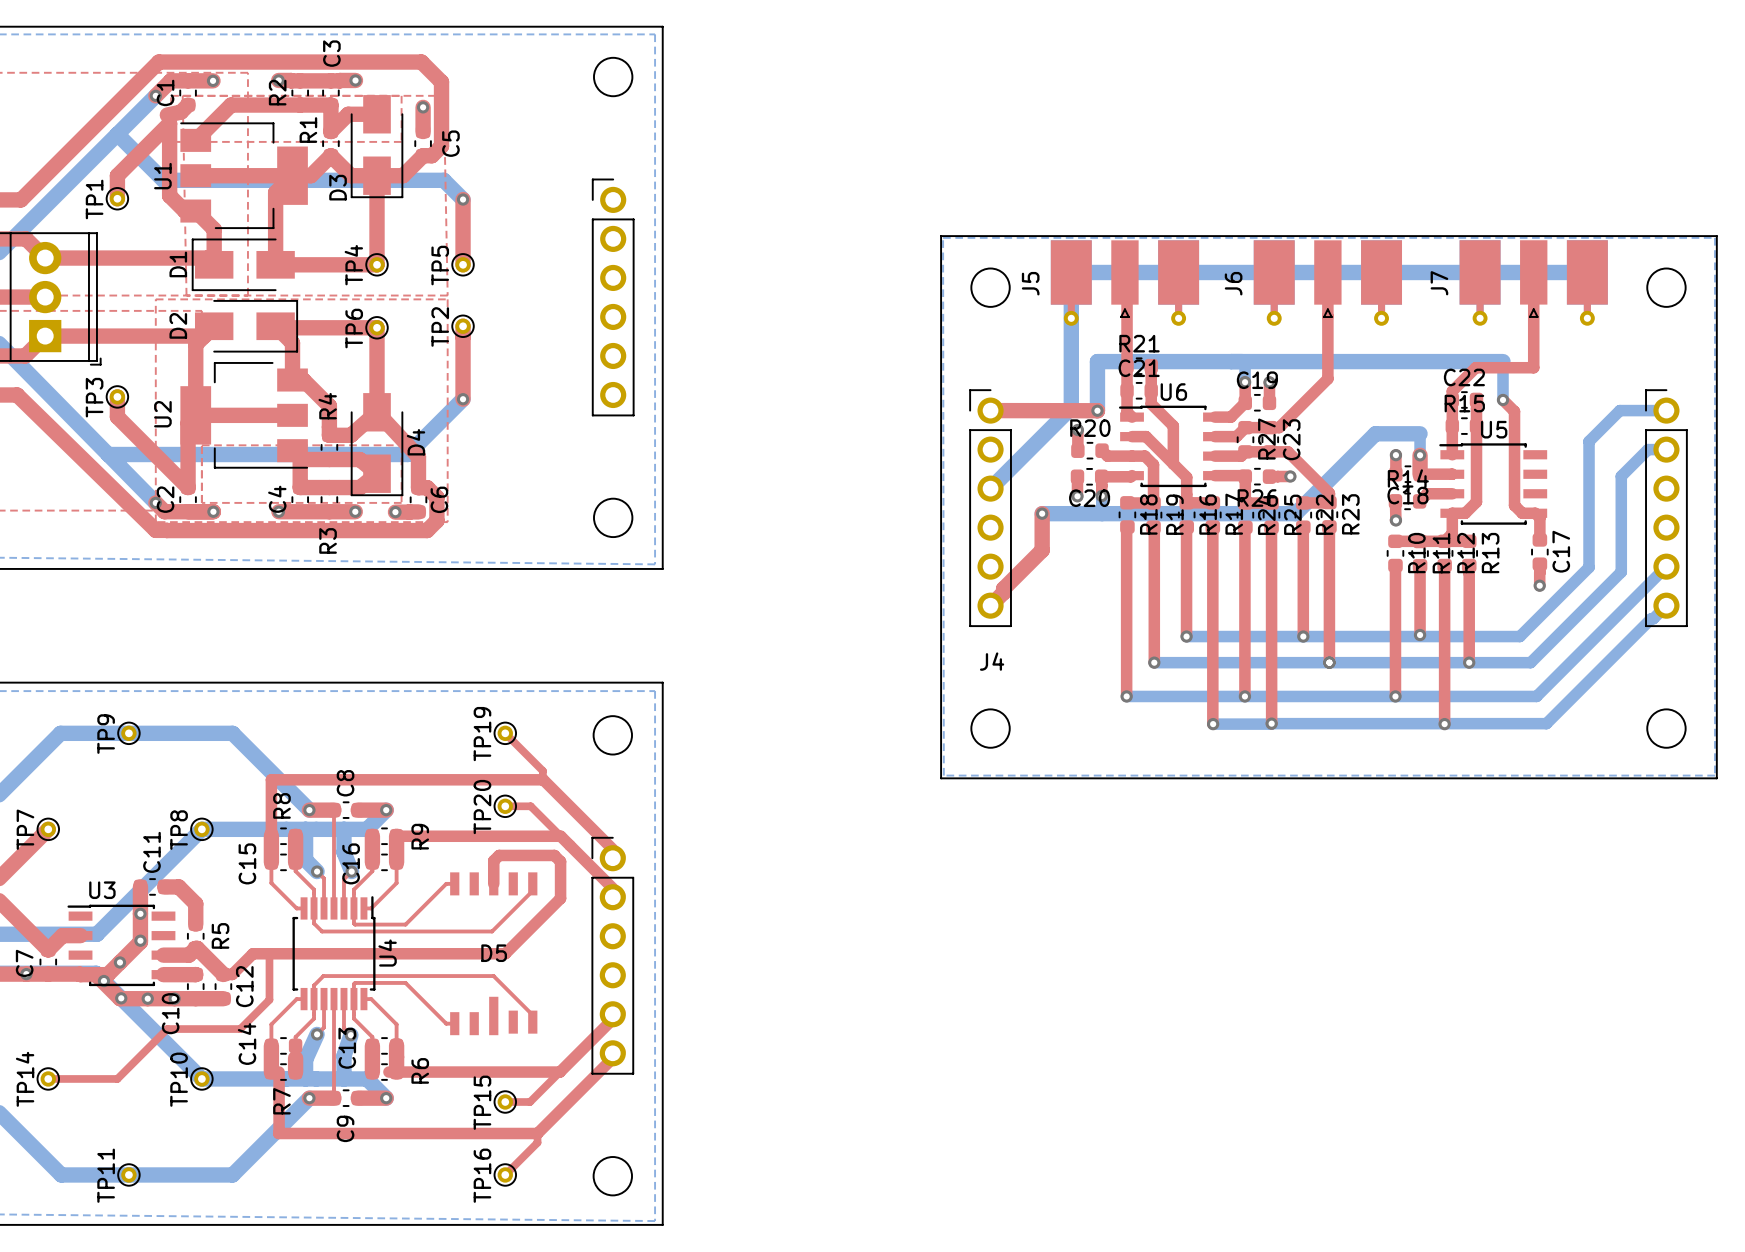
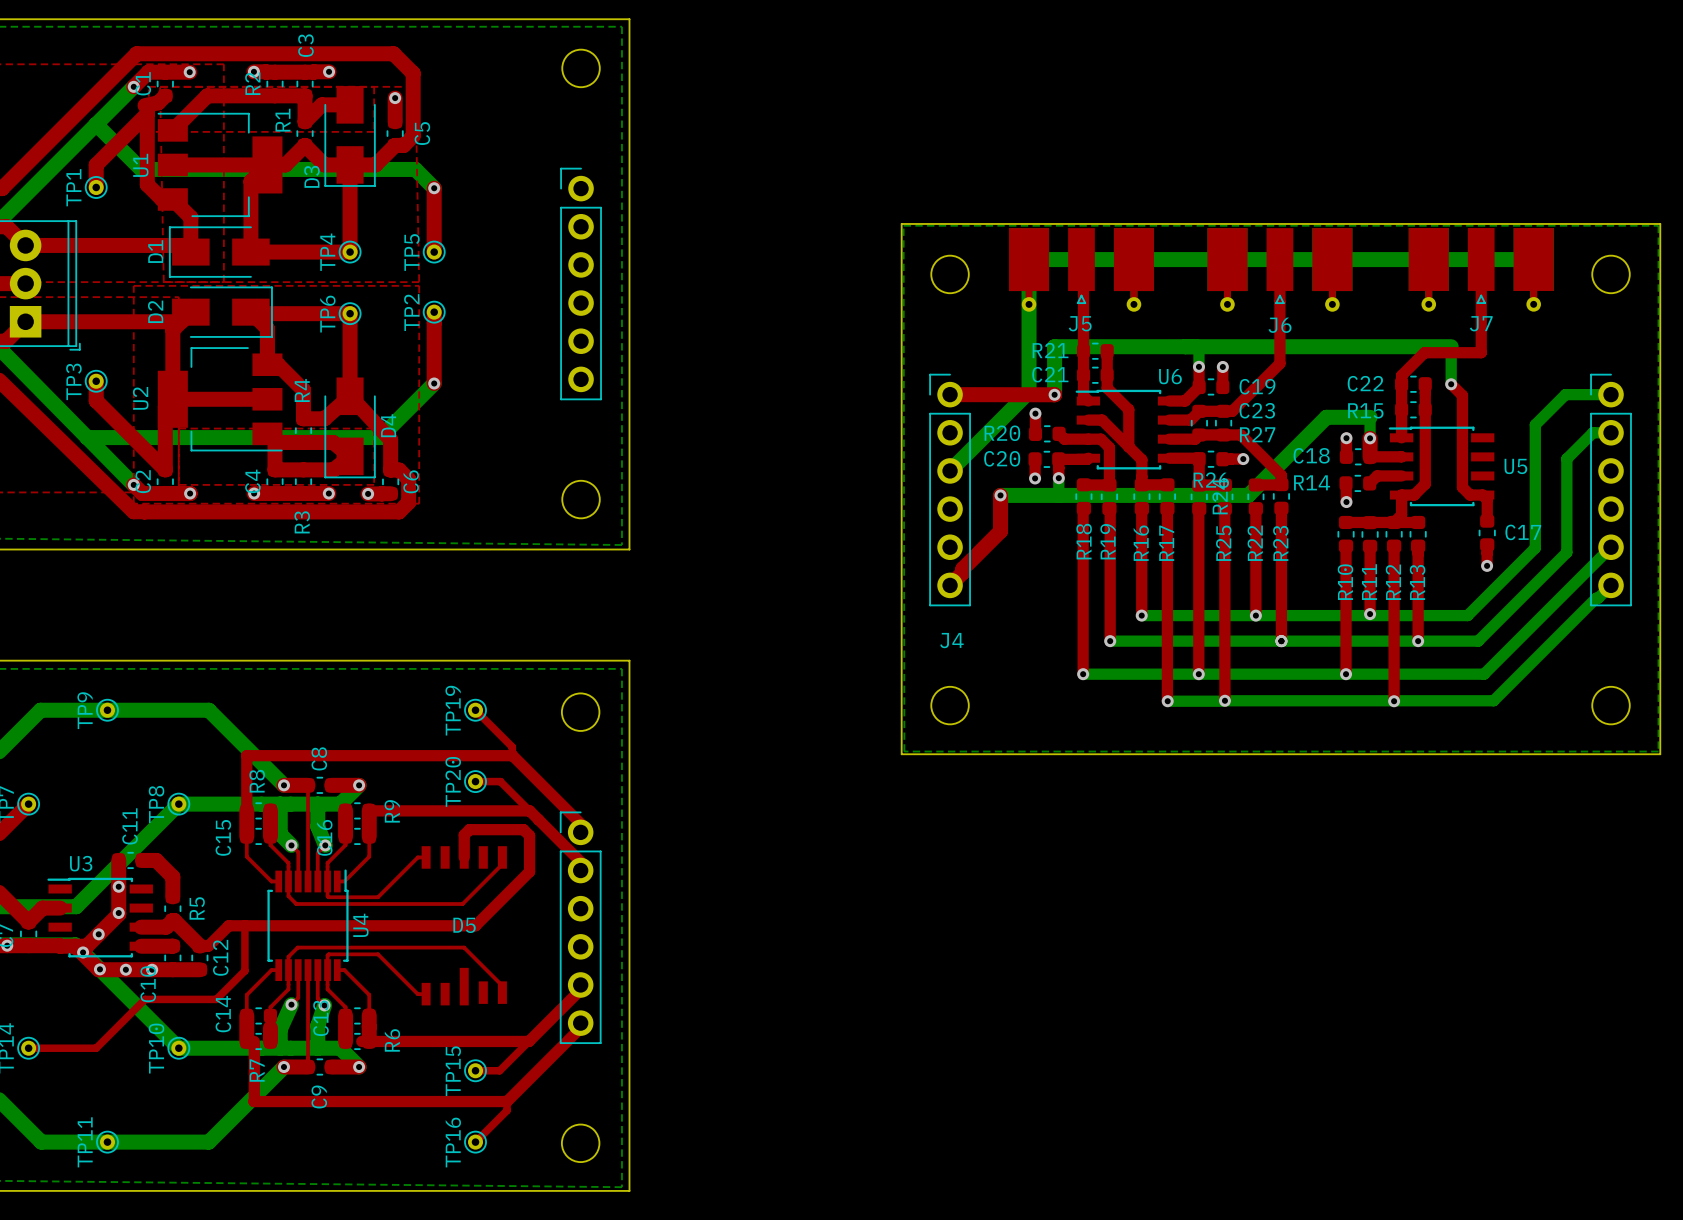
J5 name rotation: 0° (1030, 283) -> 90° clockwise (1080, 323)
J5 name position: J5 (1030, 283) -> J5 (1080, 323)
J6 name rotation: 0° (1233, 283) -> 90° clockwise (1280, 325)
J6 name position: J6 (1233, 283) -> J6 (1280, 325)
J7 name rotation: 0° (1439, 283) -> 90° clockwise (1481, 323)
J7 name position: J7 (1439, 283) -> J7 (1481, 323)
R21 name position: R21 (1139, 343) -> R21 (1050, 350)
C21 name position: C21 (1139, 368) -> C21 (1050, 374)
C22 name position: C22 (1464, 377) -> C22 (1365, 383)
C19 name position: C19 (1257, 380) -> C19 (1257, 386)
U6 name position: U6 (1173, 392) -> U6 (1170, 376)
R15 name position: R15 (1464, 403) -> R15 (1365, 410)
R20 name position: R20 (1090, 428) -> R20 (1002, 433)
U5 name position: U5 (1494, 429) -> U5 (1515, 466)
R27 name rotation: 0° (1266, 439) -> 90° clockwise (1257, 434)
C23 name rotation: 0° (1291, 439) -> 90° clockwise (1257, 410)
R14 name position: R14 (1408, 478) -> R14 (1312, 482)
C18 name position: C18 (1407, 495) -> C18 (1311, 455)
C20 name position: C20 (1089, 498) -> C20 (1002, 458)
R18 name position: R18 (1148, 514) -> R18 (1084, 541)
R19 name position: R19 (1174, 514) -> R19 (1107, 541)
R16 name position: R16 (1208, 514) -> R16 (1141, 543)
R17 name position: R17 (1234, 514) -> R17 (1166, 543)
R25 name position: R25 (1292, 514) -> R25 (1223, 543)
R22 name position: R22 (1324, 514) -> R22 (1255, 543)
R23 name position: R23 (1350, 514) -> R23 (1280, 543)
C17 name rotation: 0° (1561, 551) -> 90° clockwise (1523, 532)
R10 name position: R10 (1416, 553) -> R10 (1345, 582)
R11 name position: R11 (1441, 553) -> R11 (1369, 582)
R12 name position: R12 (1466, 553) -> R12 (1393, 582)
R13 name position: R13 (1490, 553) -> R13 (1417, 582)

